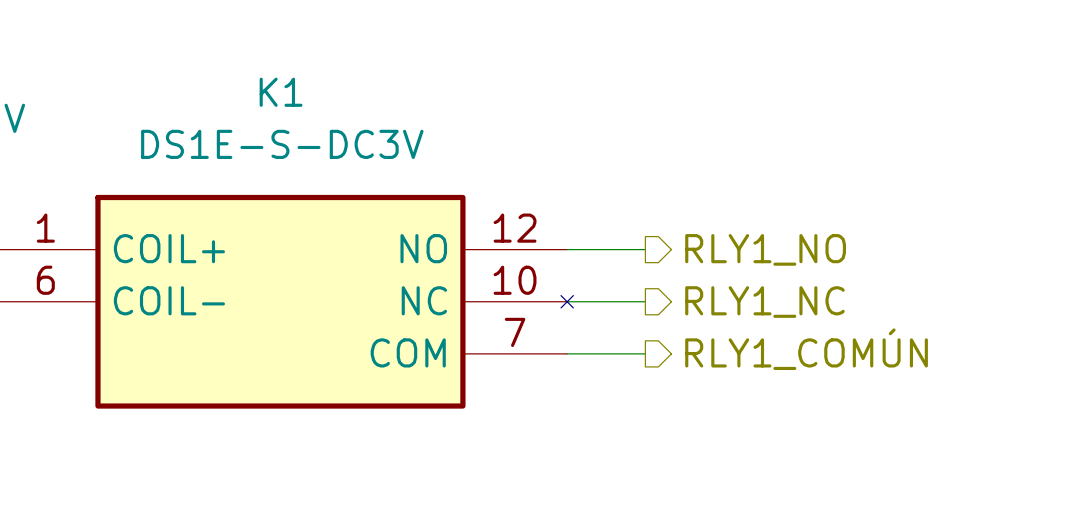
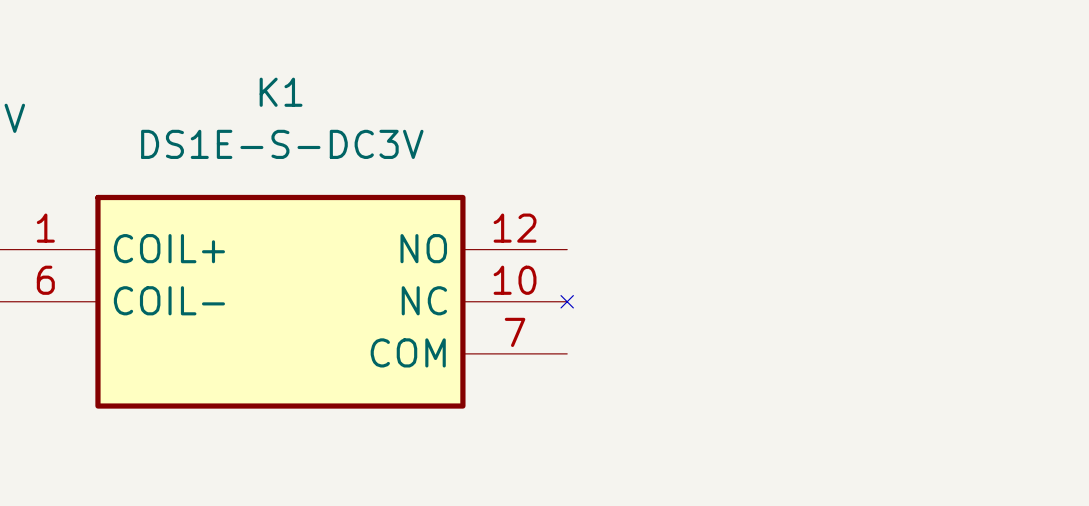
wire: (567, 249) (645, 249) -> none
hierarchical label: RLY1_NO (765, 249) -> none
wire: (567, 301) (645, 301) -> none
hierarchical label: RLY1_NC (764, 302) -> none
hierarchical label: RLY1_COMÚN (806, 349) -> none
wire: (567, 353) (645, 353) -> none

